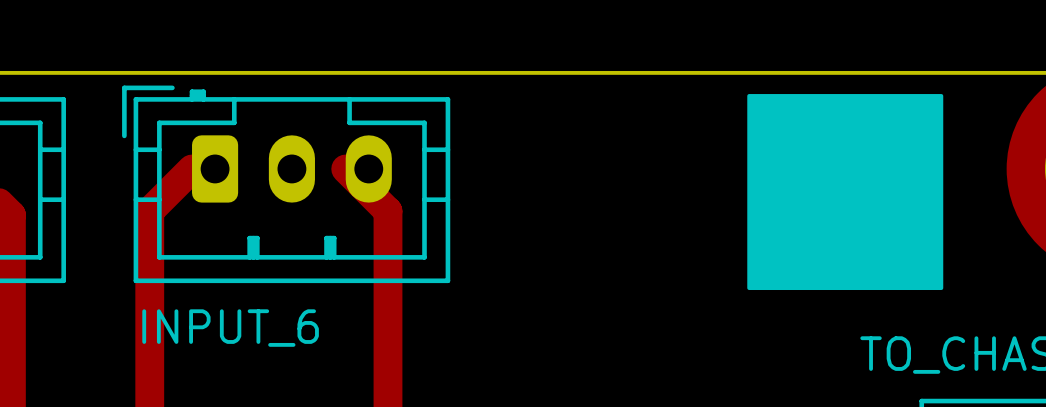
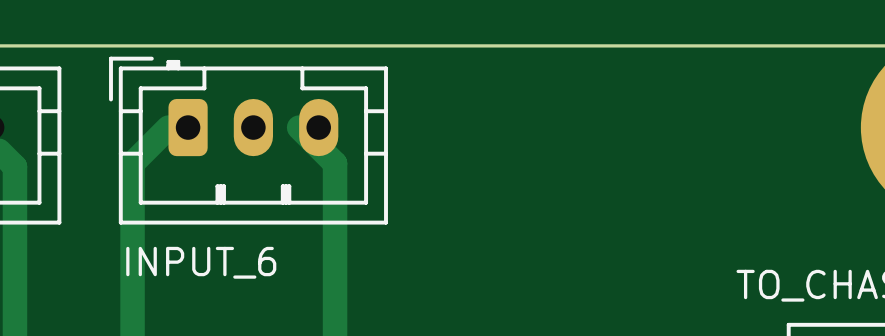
drawing: [747, 94, 944, 291] -> none

